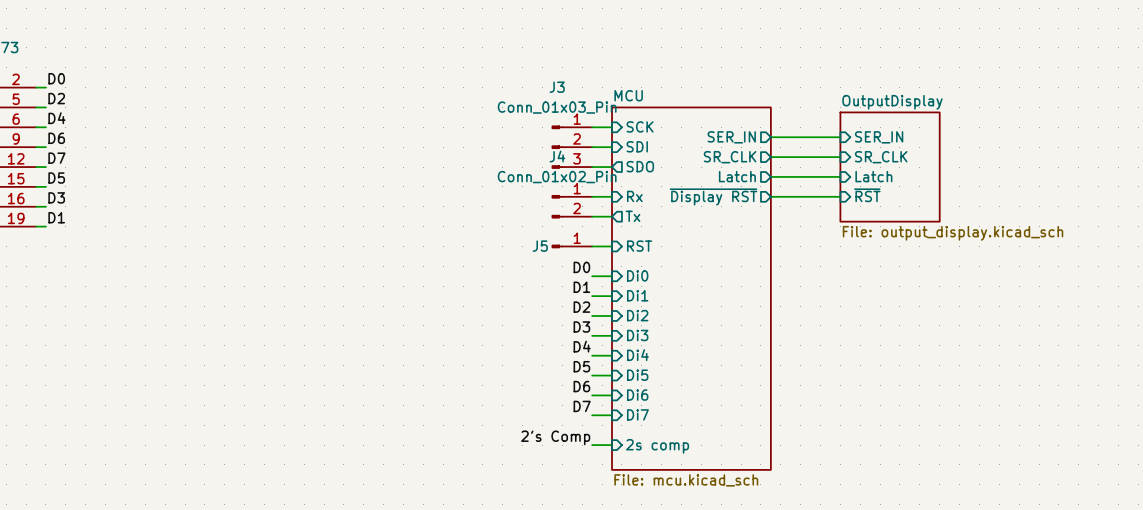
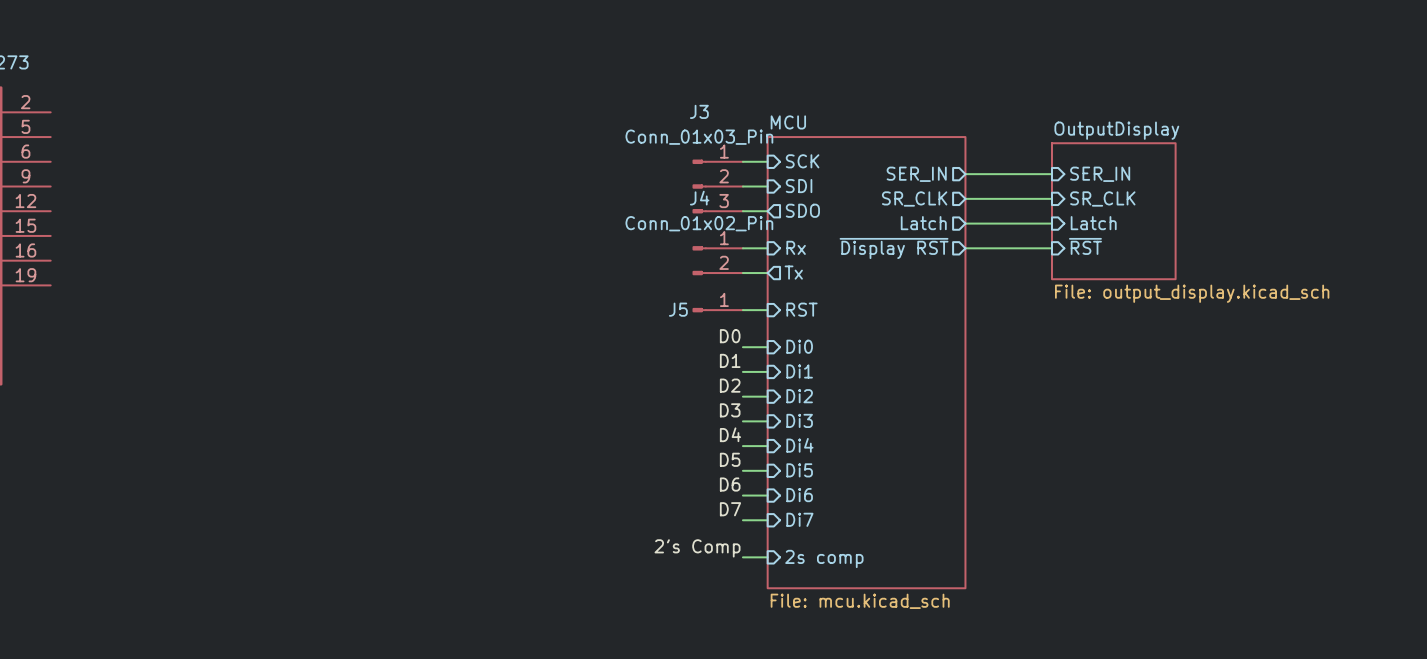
label: D0 (56, 78) -> none
wire: (36, 87) (45, 87) -> none
label: D2 (56, 98) -> none
wire: (36, 107) (45, 107) -> none
label: D4 (56, 118) -> none
wire: (36, 127) (45, 127) -> none
label: D6 (56, 138) -> none
wire: (36, 147) (45, 147) -> none
label: D7 (56, 158) -> none
wire: (36, 167) (45, 167) -> none
label: D5 (56, 178) -> none
wire: (36, 186) (45, 186) -> none
label: D3 (56, 197) -> none
wire: (36, 206) (45, 206) -> none
label: D1 (56, 217) -> none
wire: (36, 226) (45, 226) -> none

